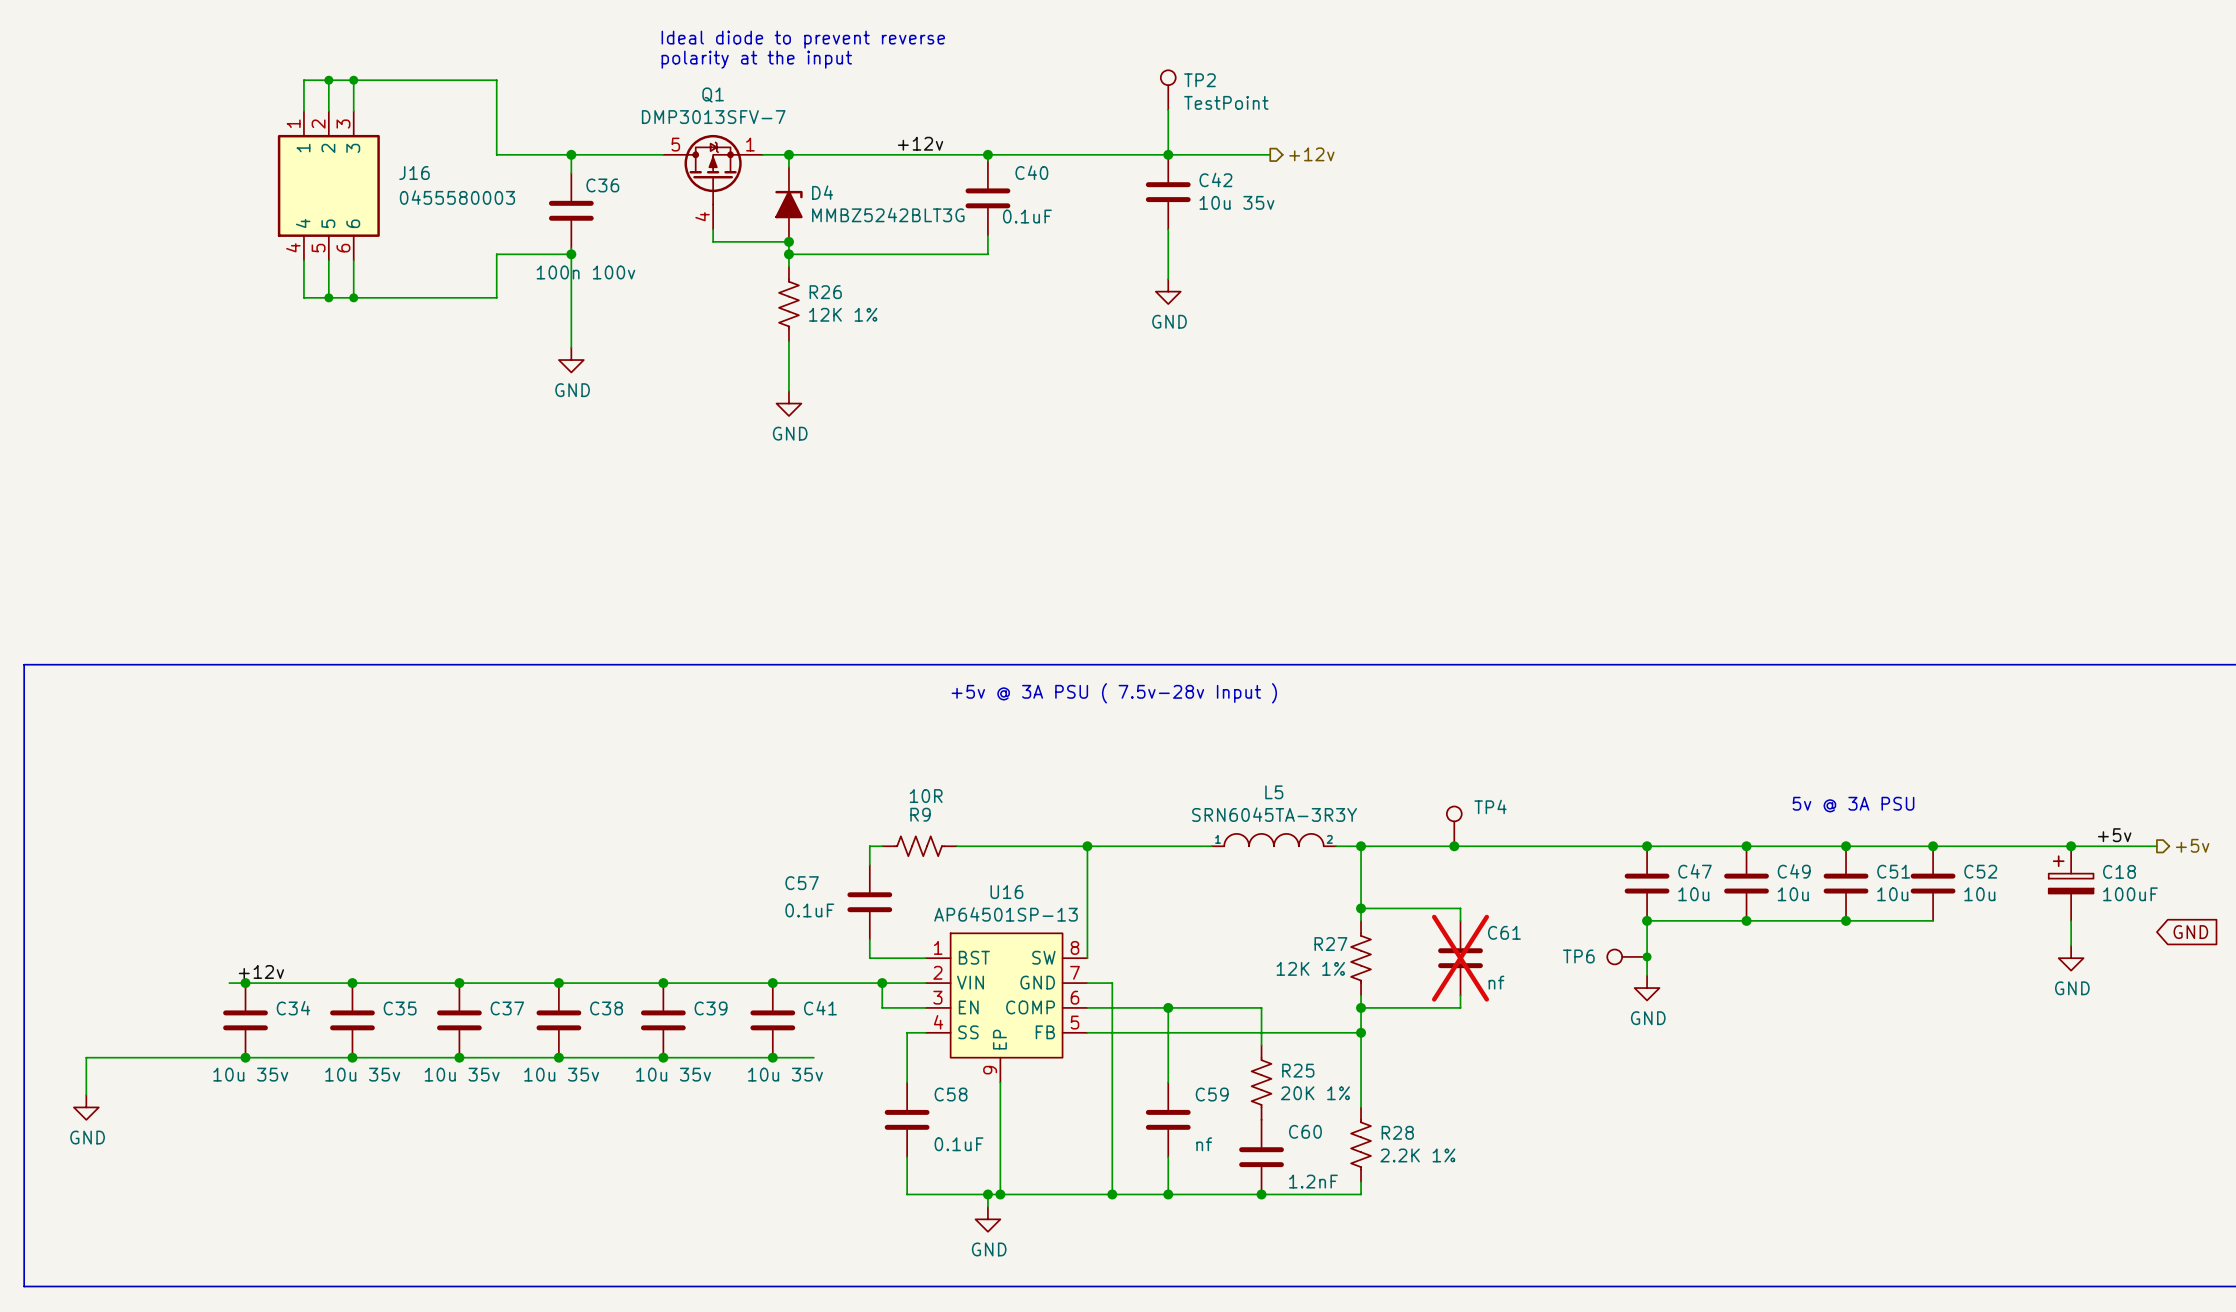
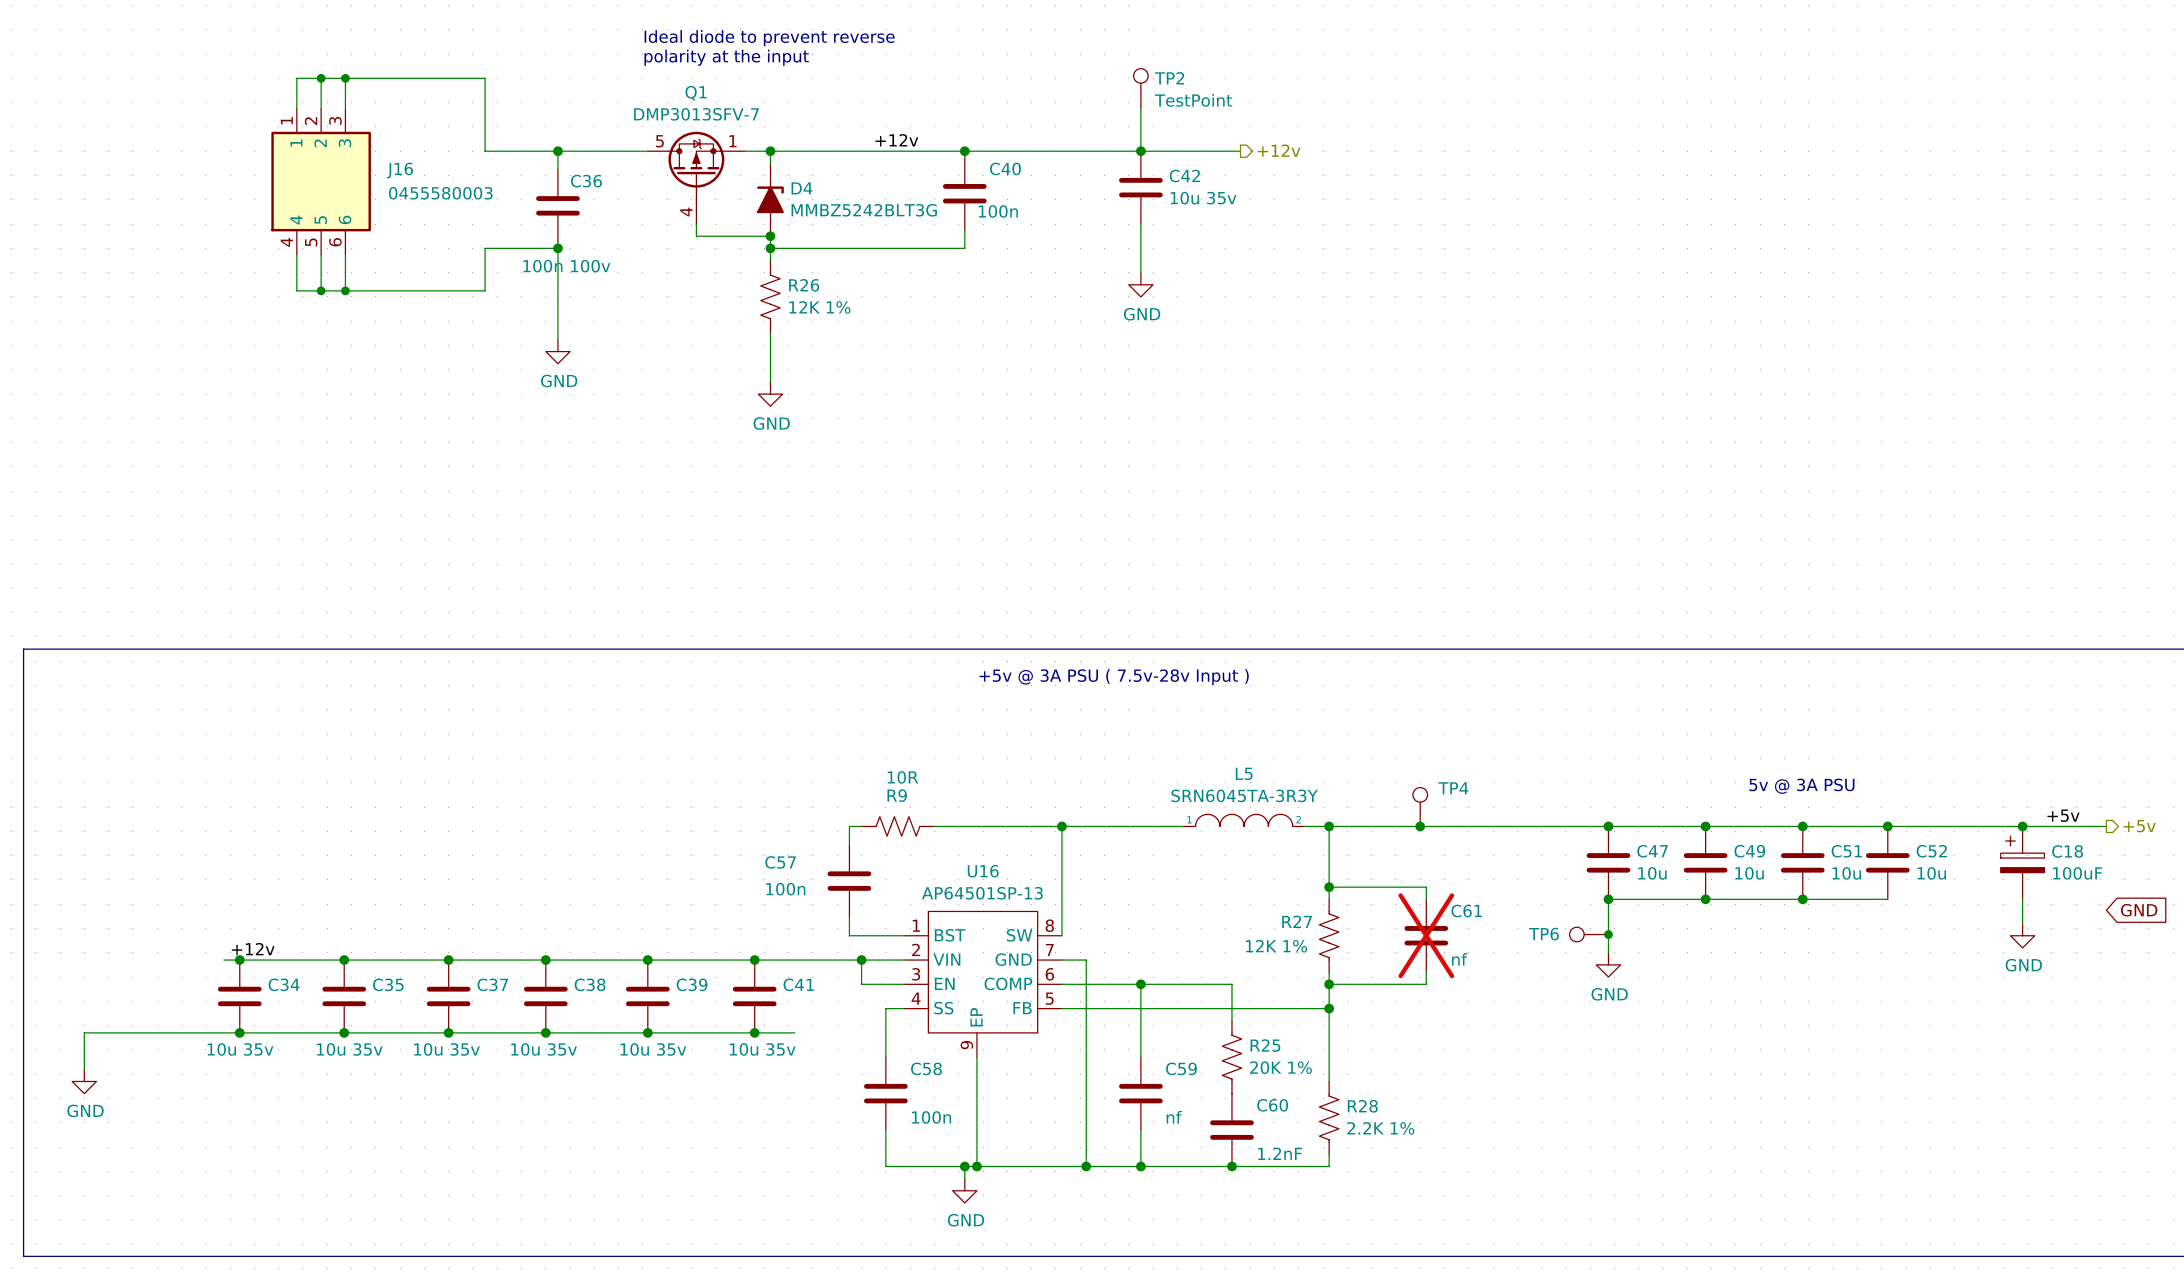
C40 value: 0.1uF (1027, 216) -> 100n (998, 211)
C57 value: 0.1uF (809, 910) -> 100n (785, 889)
U16 symbol: [925, 933, 1088, 1083] -> [904, 911, 1062, 1058]
C58 value: 0.1uF (959, 1144) -> 100n (931, 1117)

